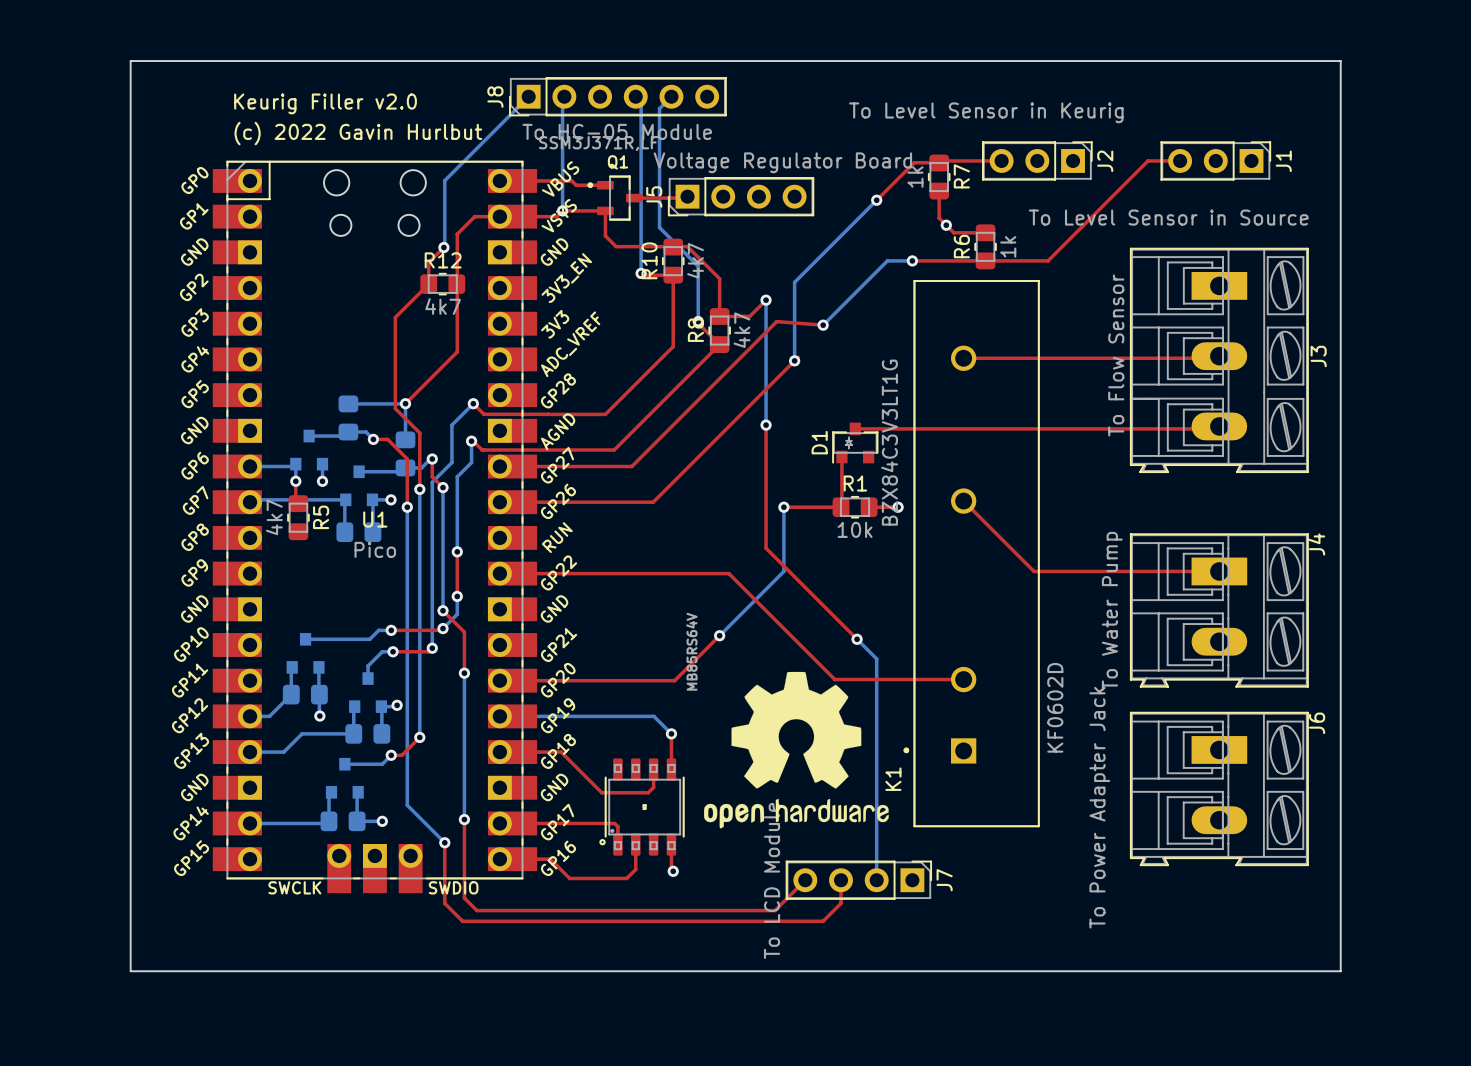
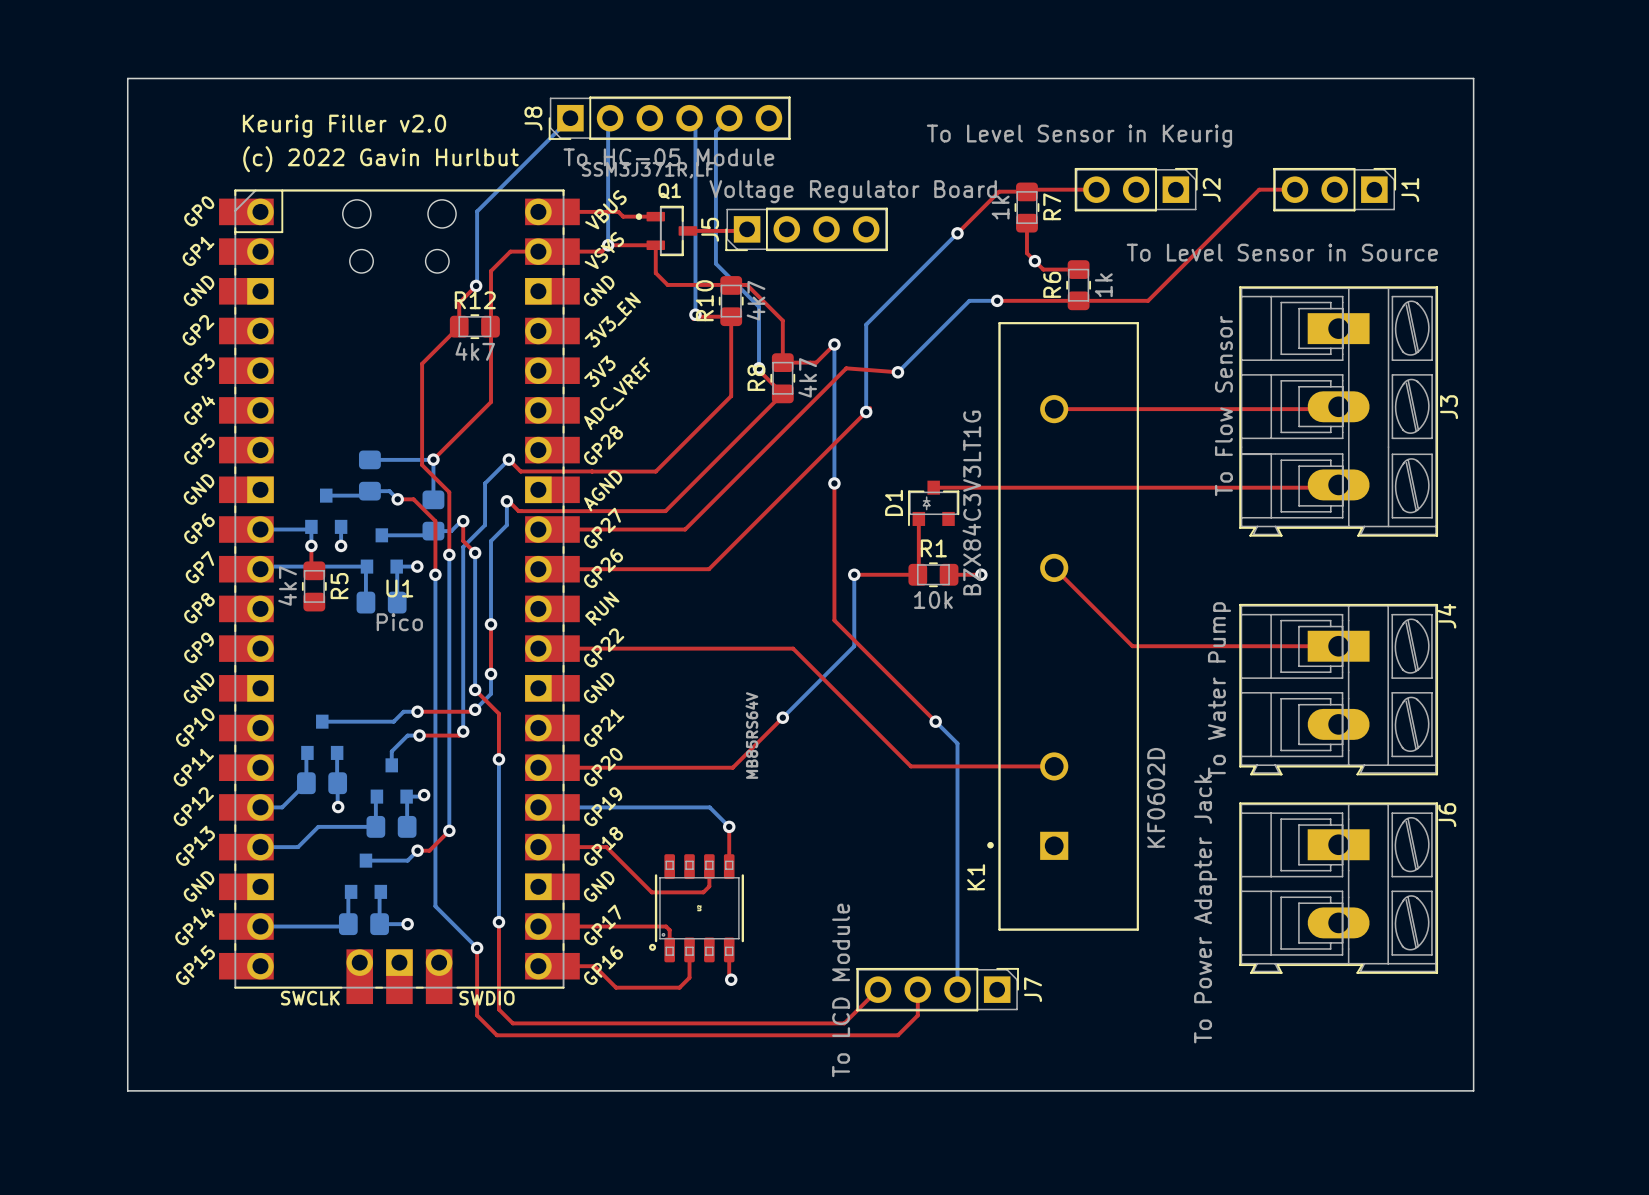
drawing: [704, 671, 889, 829] -> none

